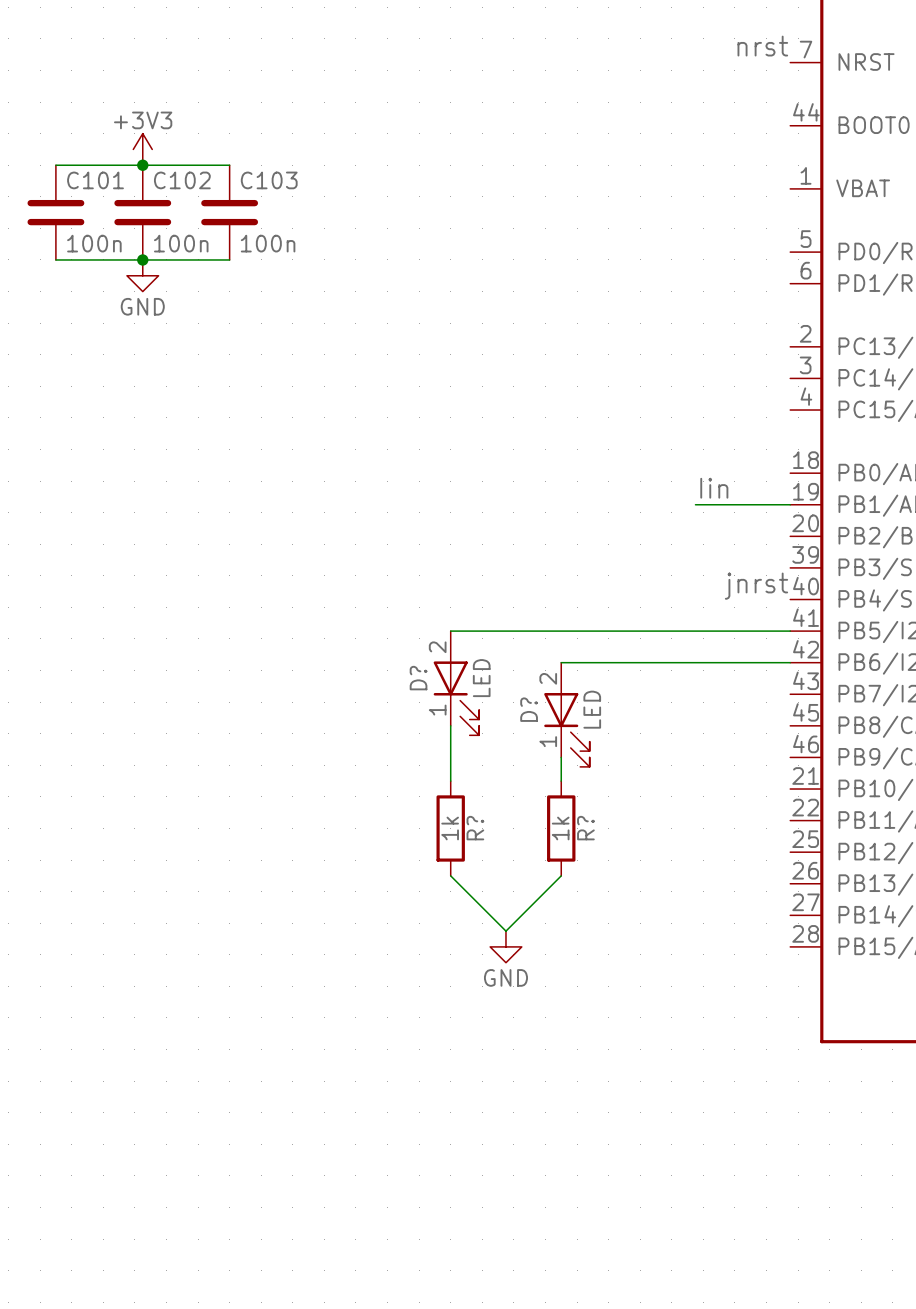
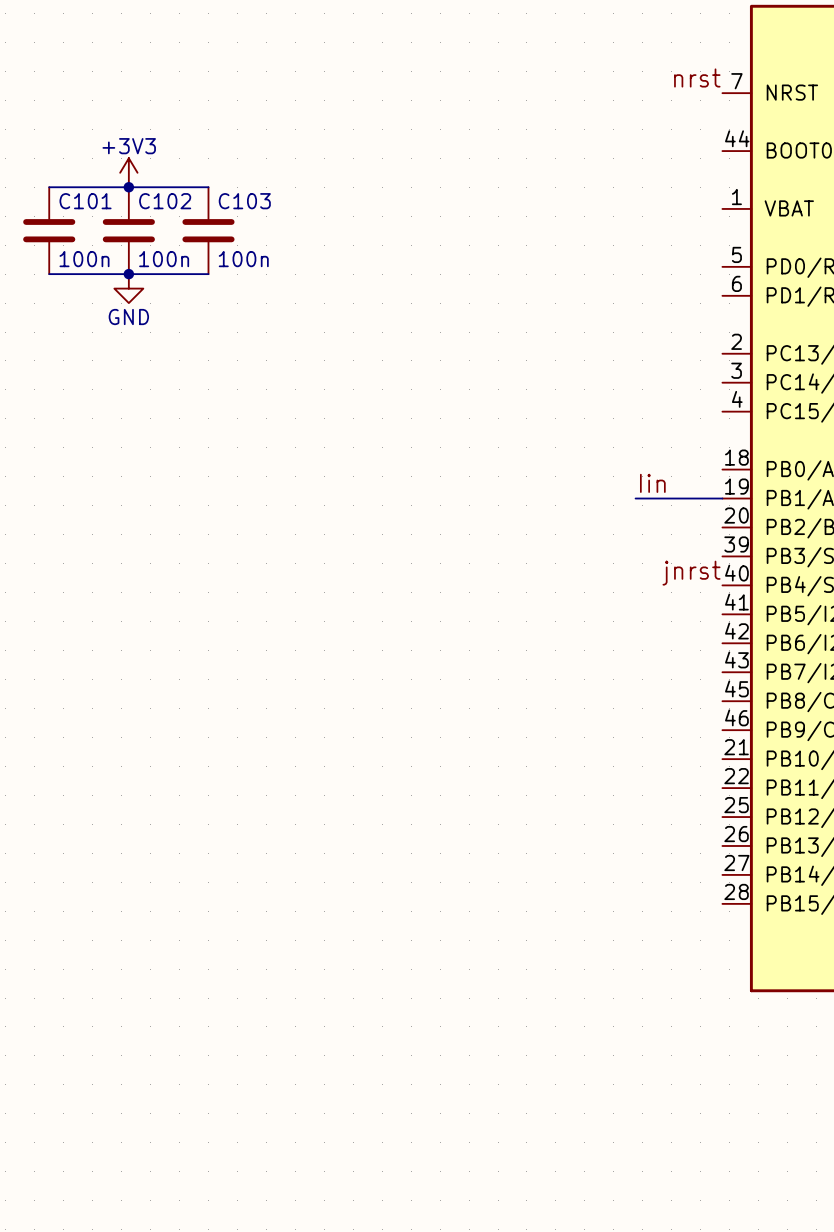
wire: (450, 631) (790, 631) -> none
wire: (561, 662) (790, 662) -> none
D?: LED (456, 683) -> none
D?: LED (566, 714) -> none
wire: (450, 725) (450, 781) -> none
wire: (561, 757) (561, 781) -> none
R?: 1k (450, 828) -> none
R?: 1k (561, 828) -> none
wire: (450, 875) (505, 931) (561, 875) -> none
power symbol: GND (505, 946) -> none

